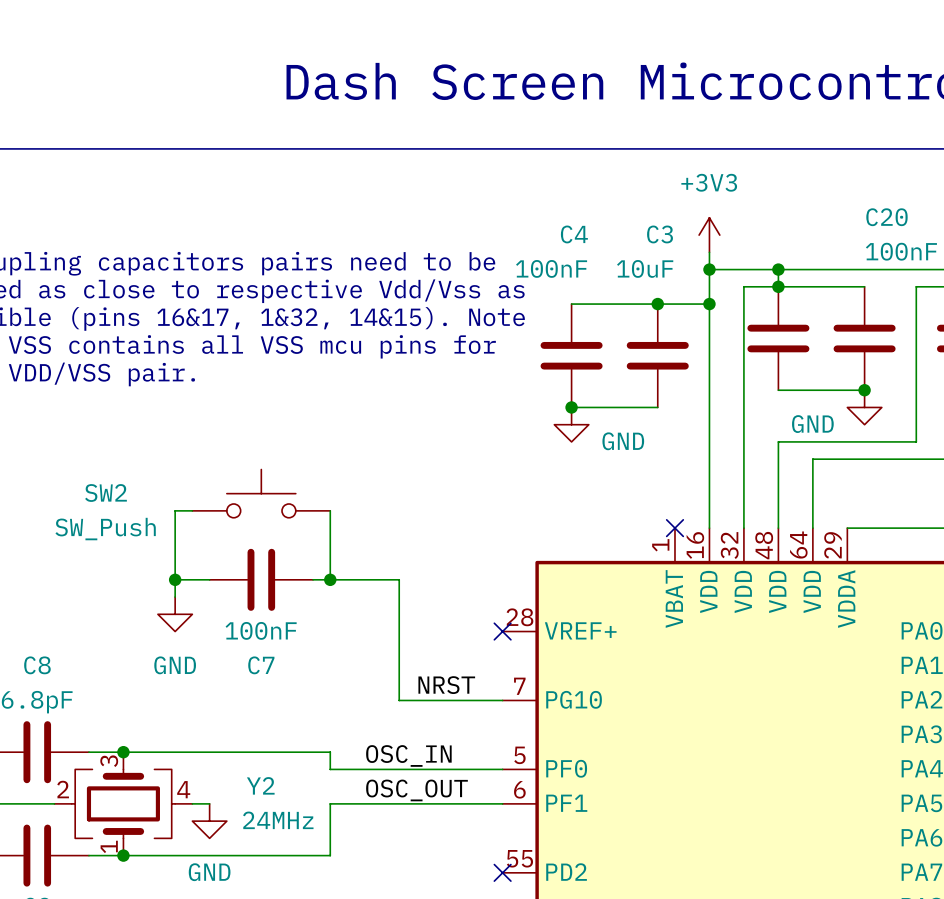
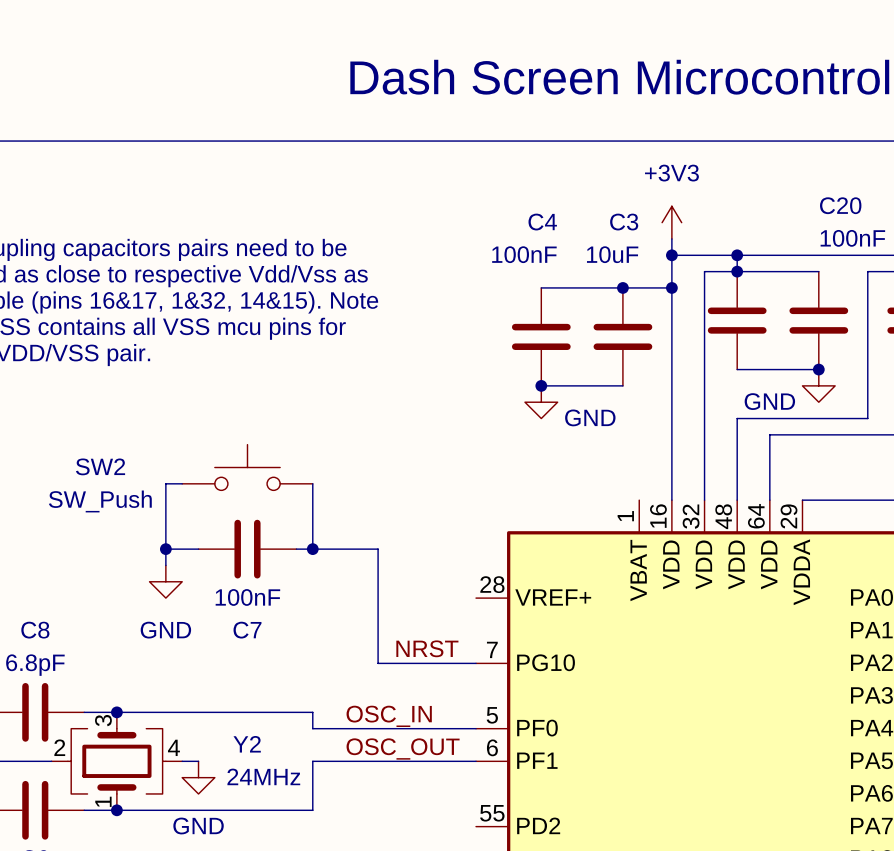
no-connect mark: (674, 528) -> none
no-connect mark: (502, 631) -> none
no-connect mark: (502, 872) -> none

